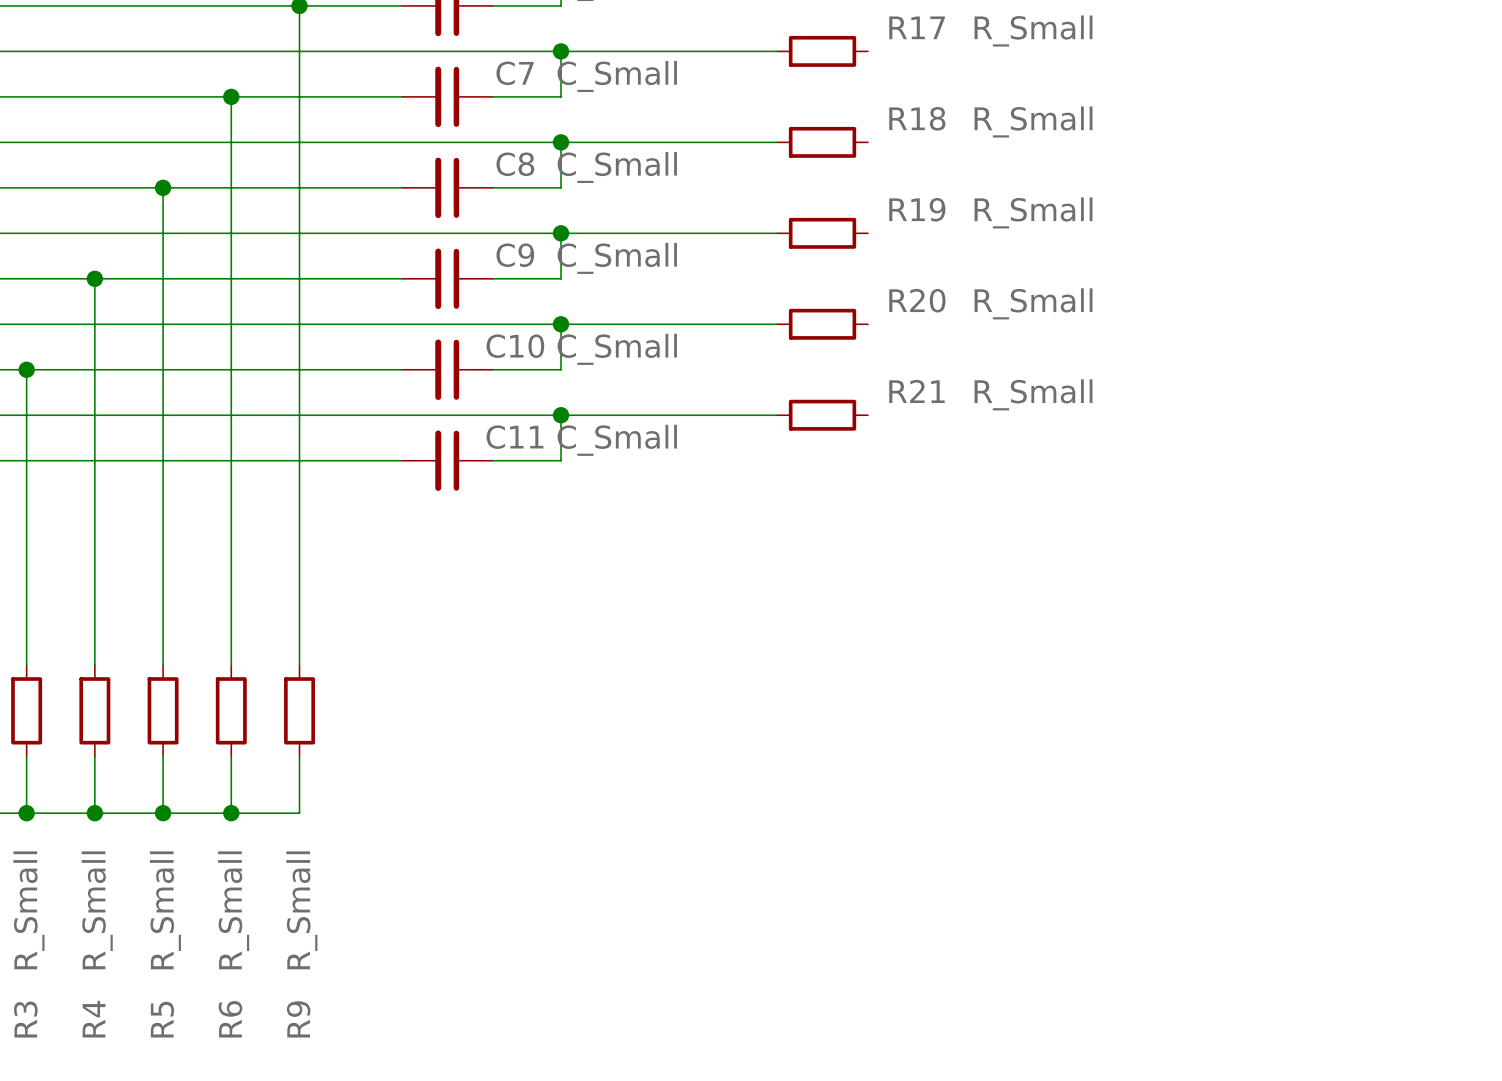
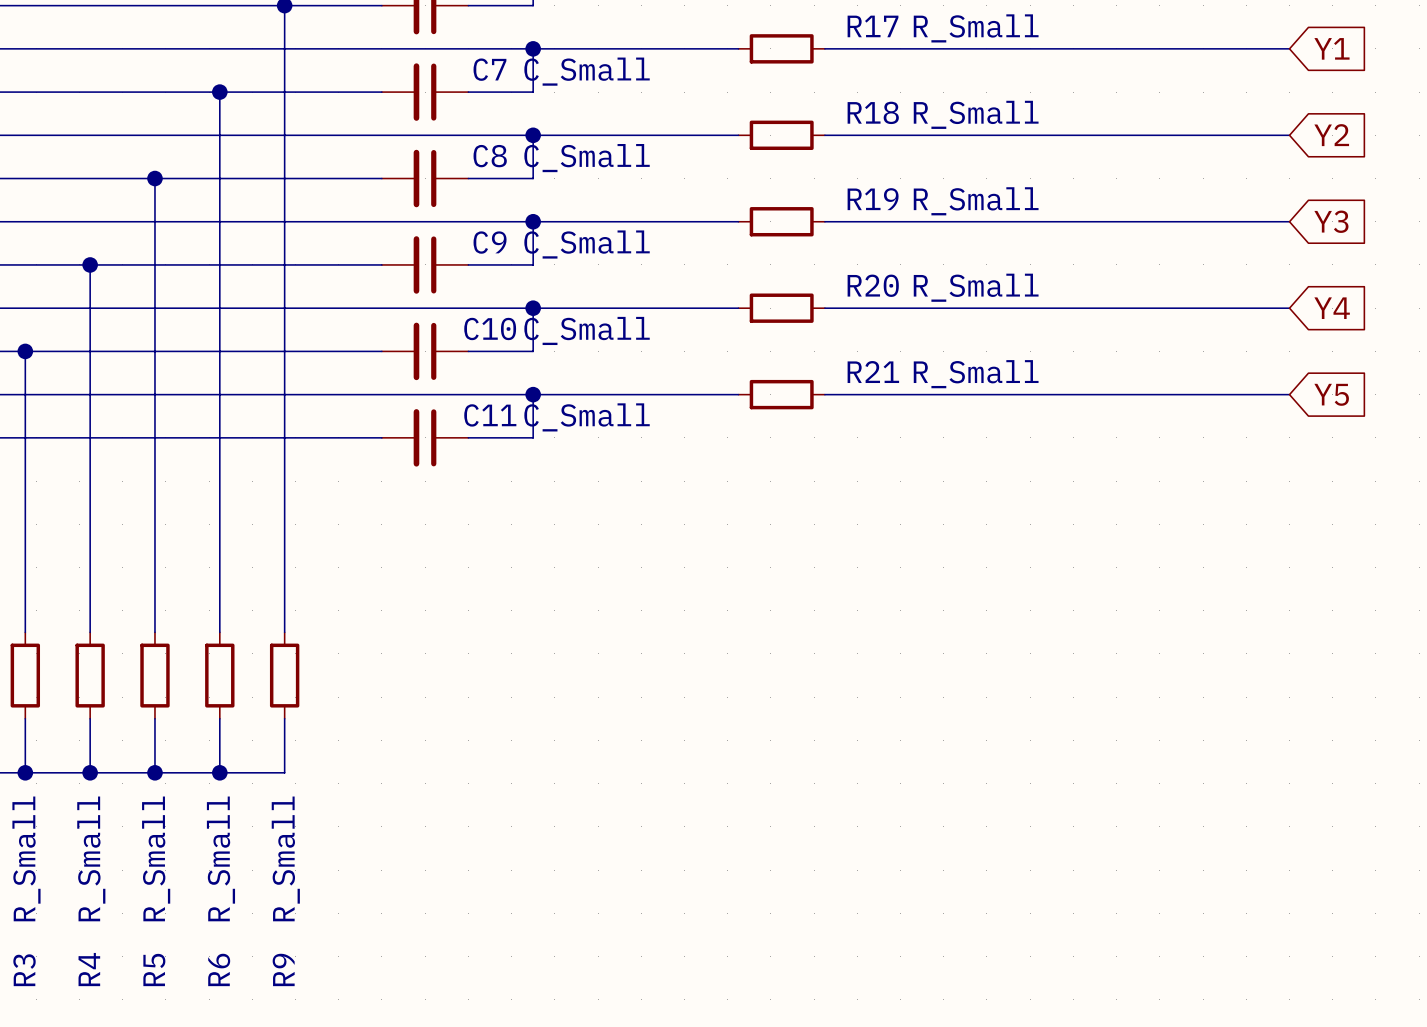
wire: none -> (824, 48) (1289, 48)
global label: none -> Y1 (1331, 48)
wire: none -> (824, 135) (1289, 135)
global label: none -> Y2 (1331, 135)
wire: none -> (824, 221) (1289, 221)
global label: none -> Y3 (1331, 221)
wire: none -> (824, 308) (1289, 308)
global label: none -> Y4 (1332, 308)
wire: none -> (824, 394) (1289, 394)
global label: none -> Y5 (1331, 394)

